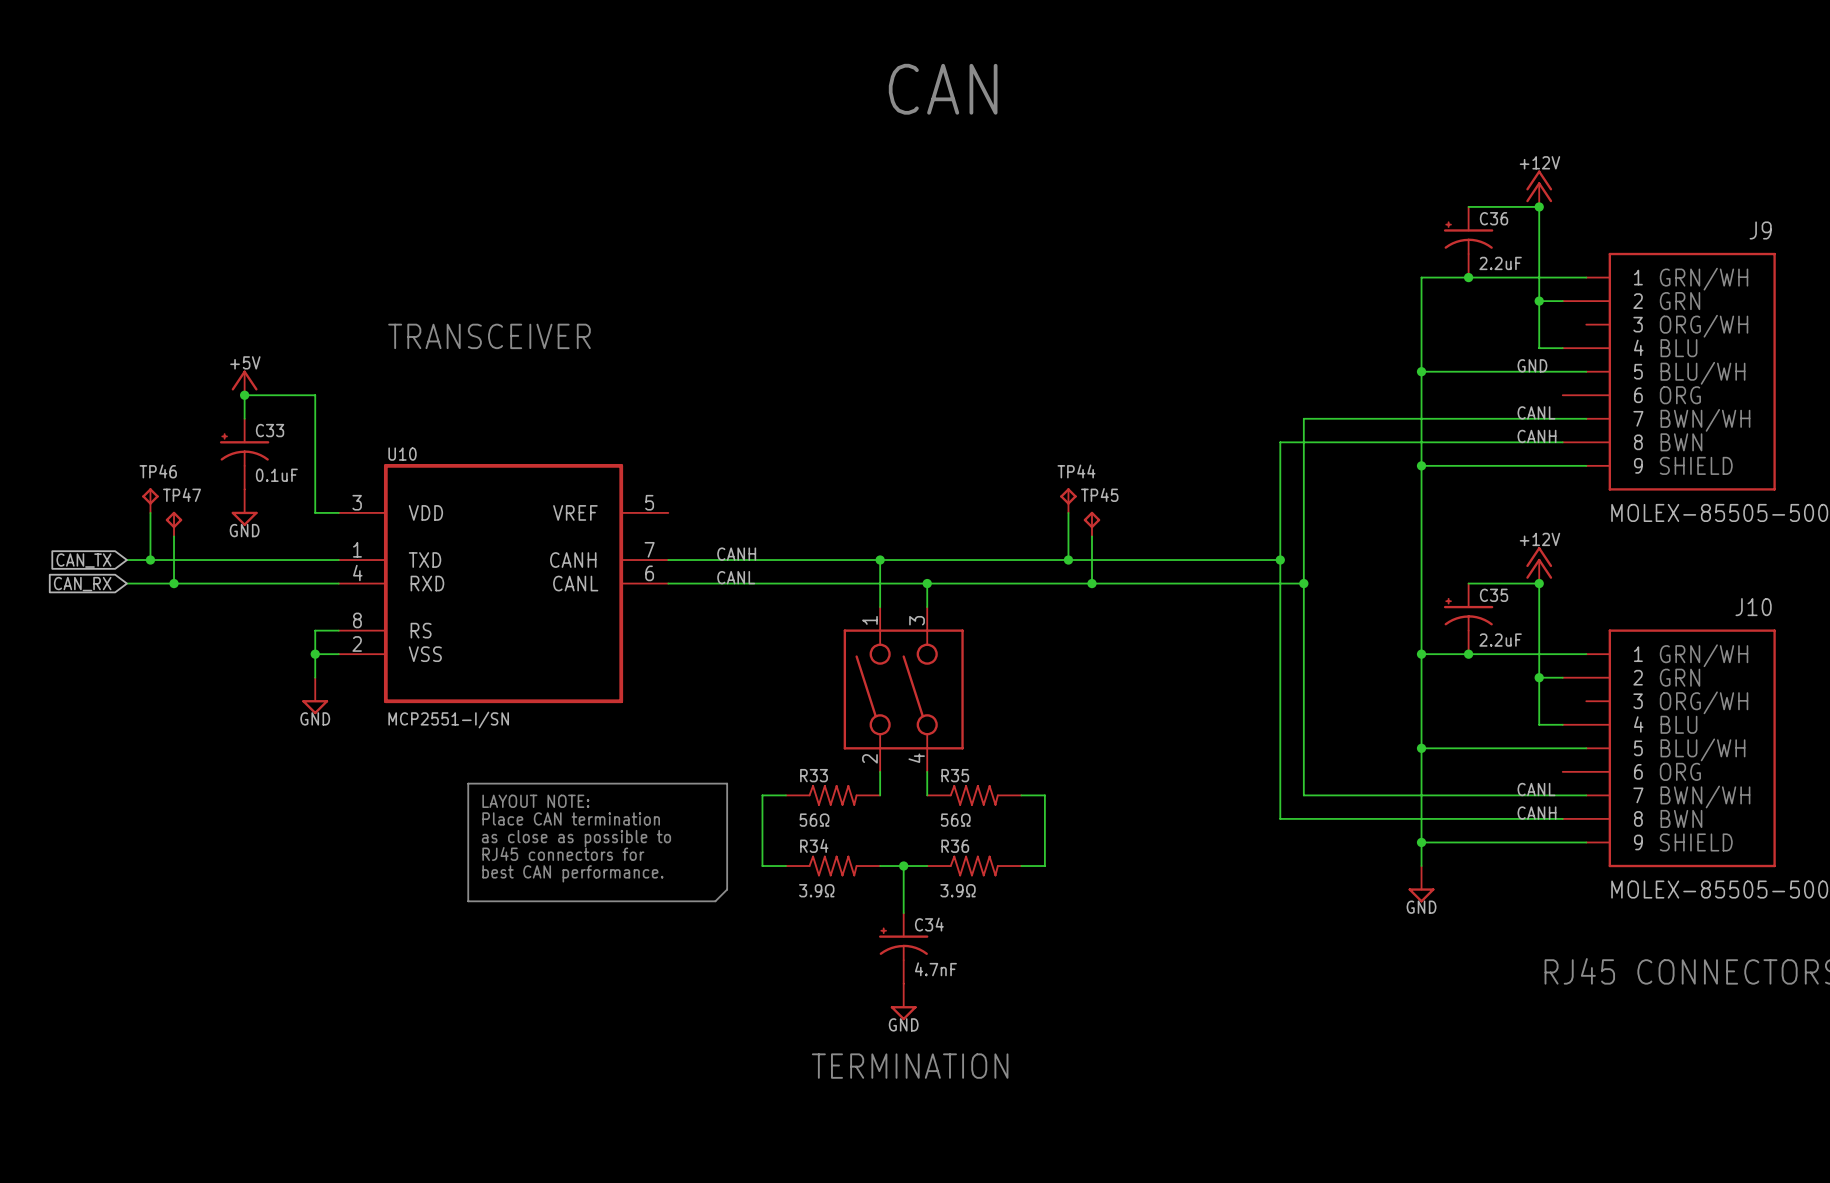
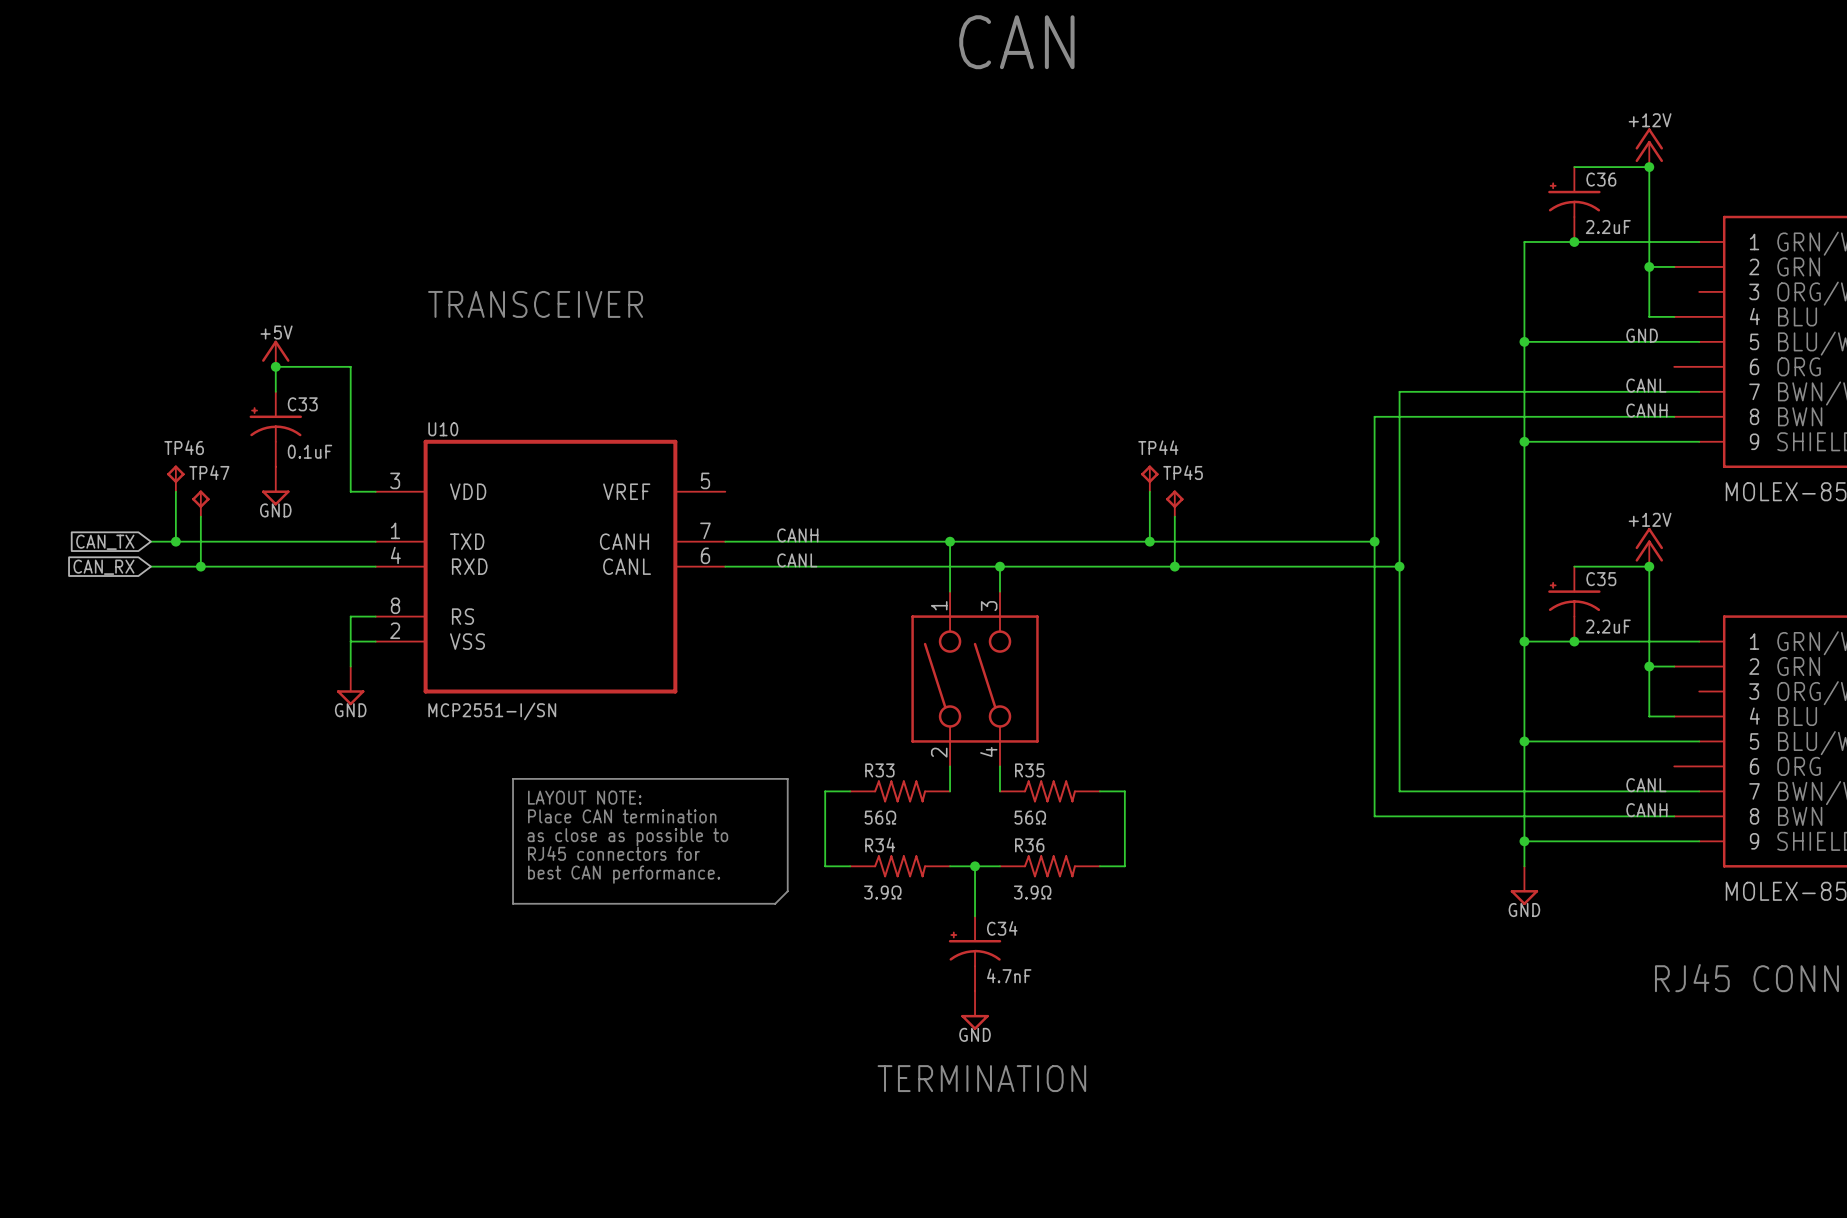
junction: (315, 654) -> none

